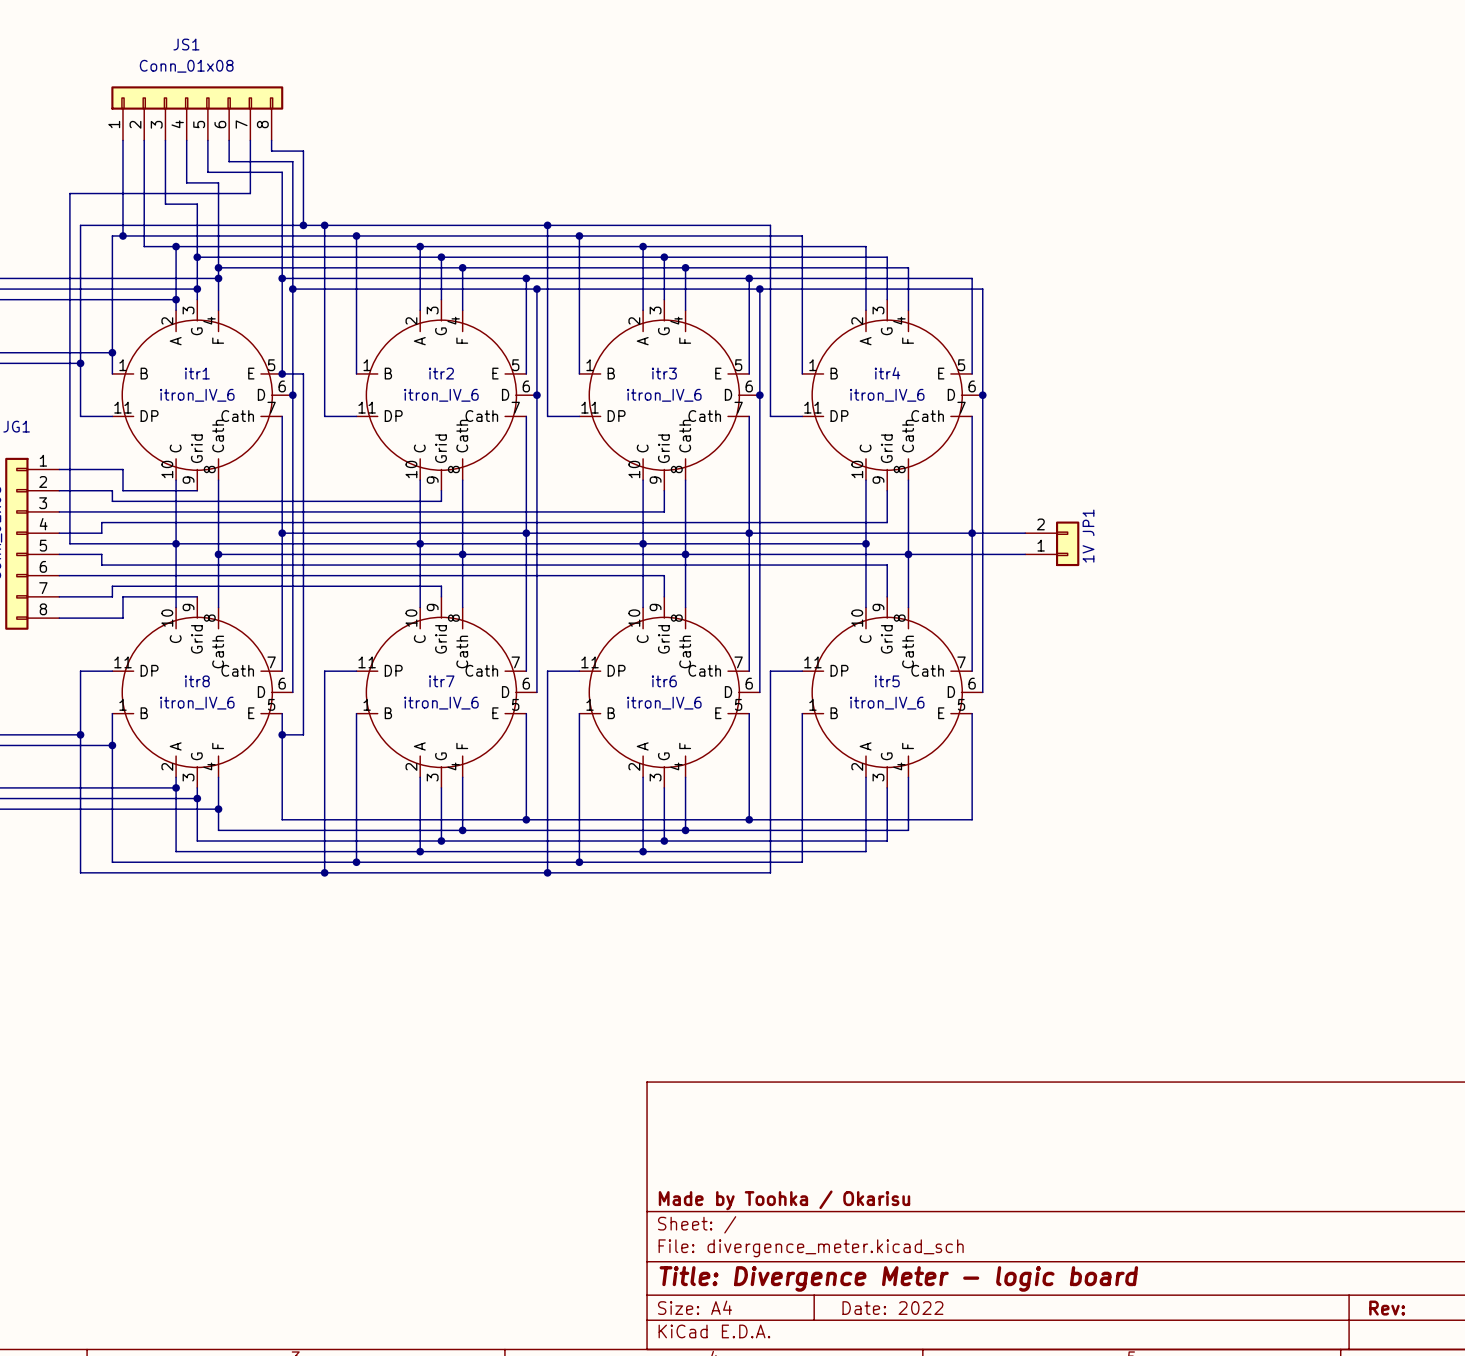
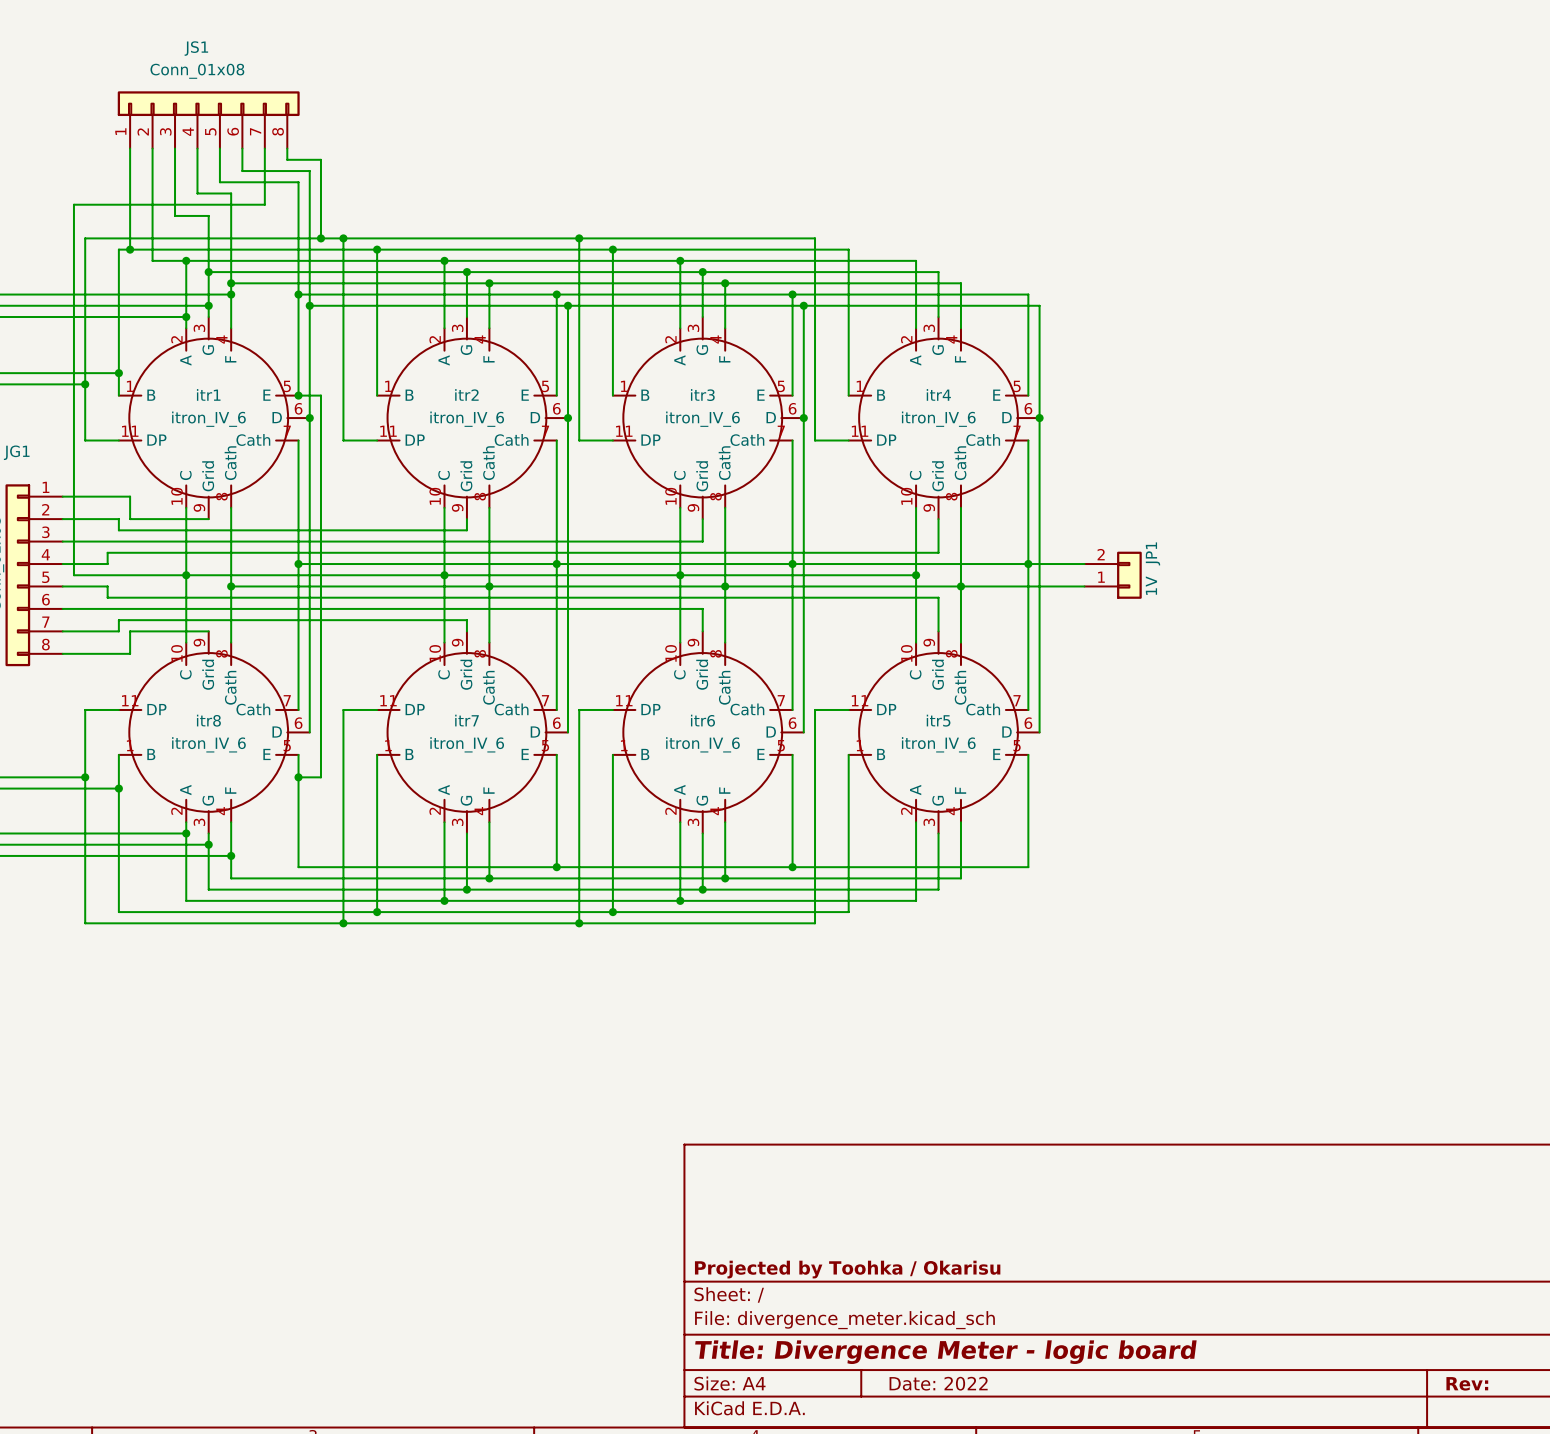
title block: Made by Toohka / Okarisu (784, 1200) -> Projected by Toohka / Okarisu (847, 1269)

